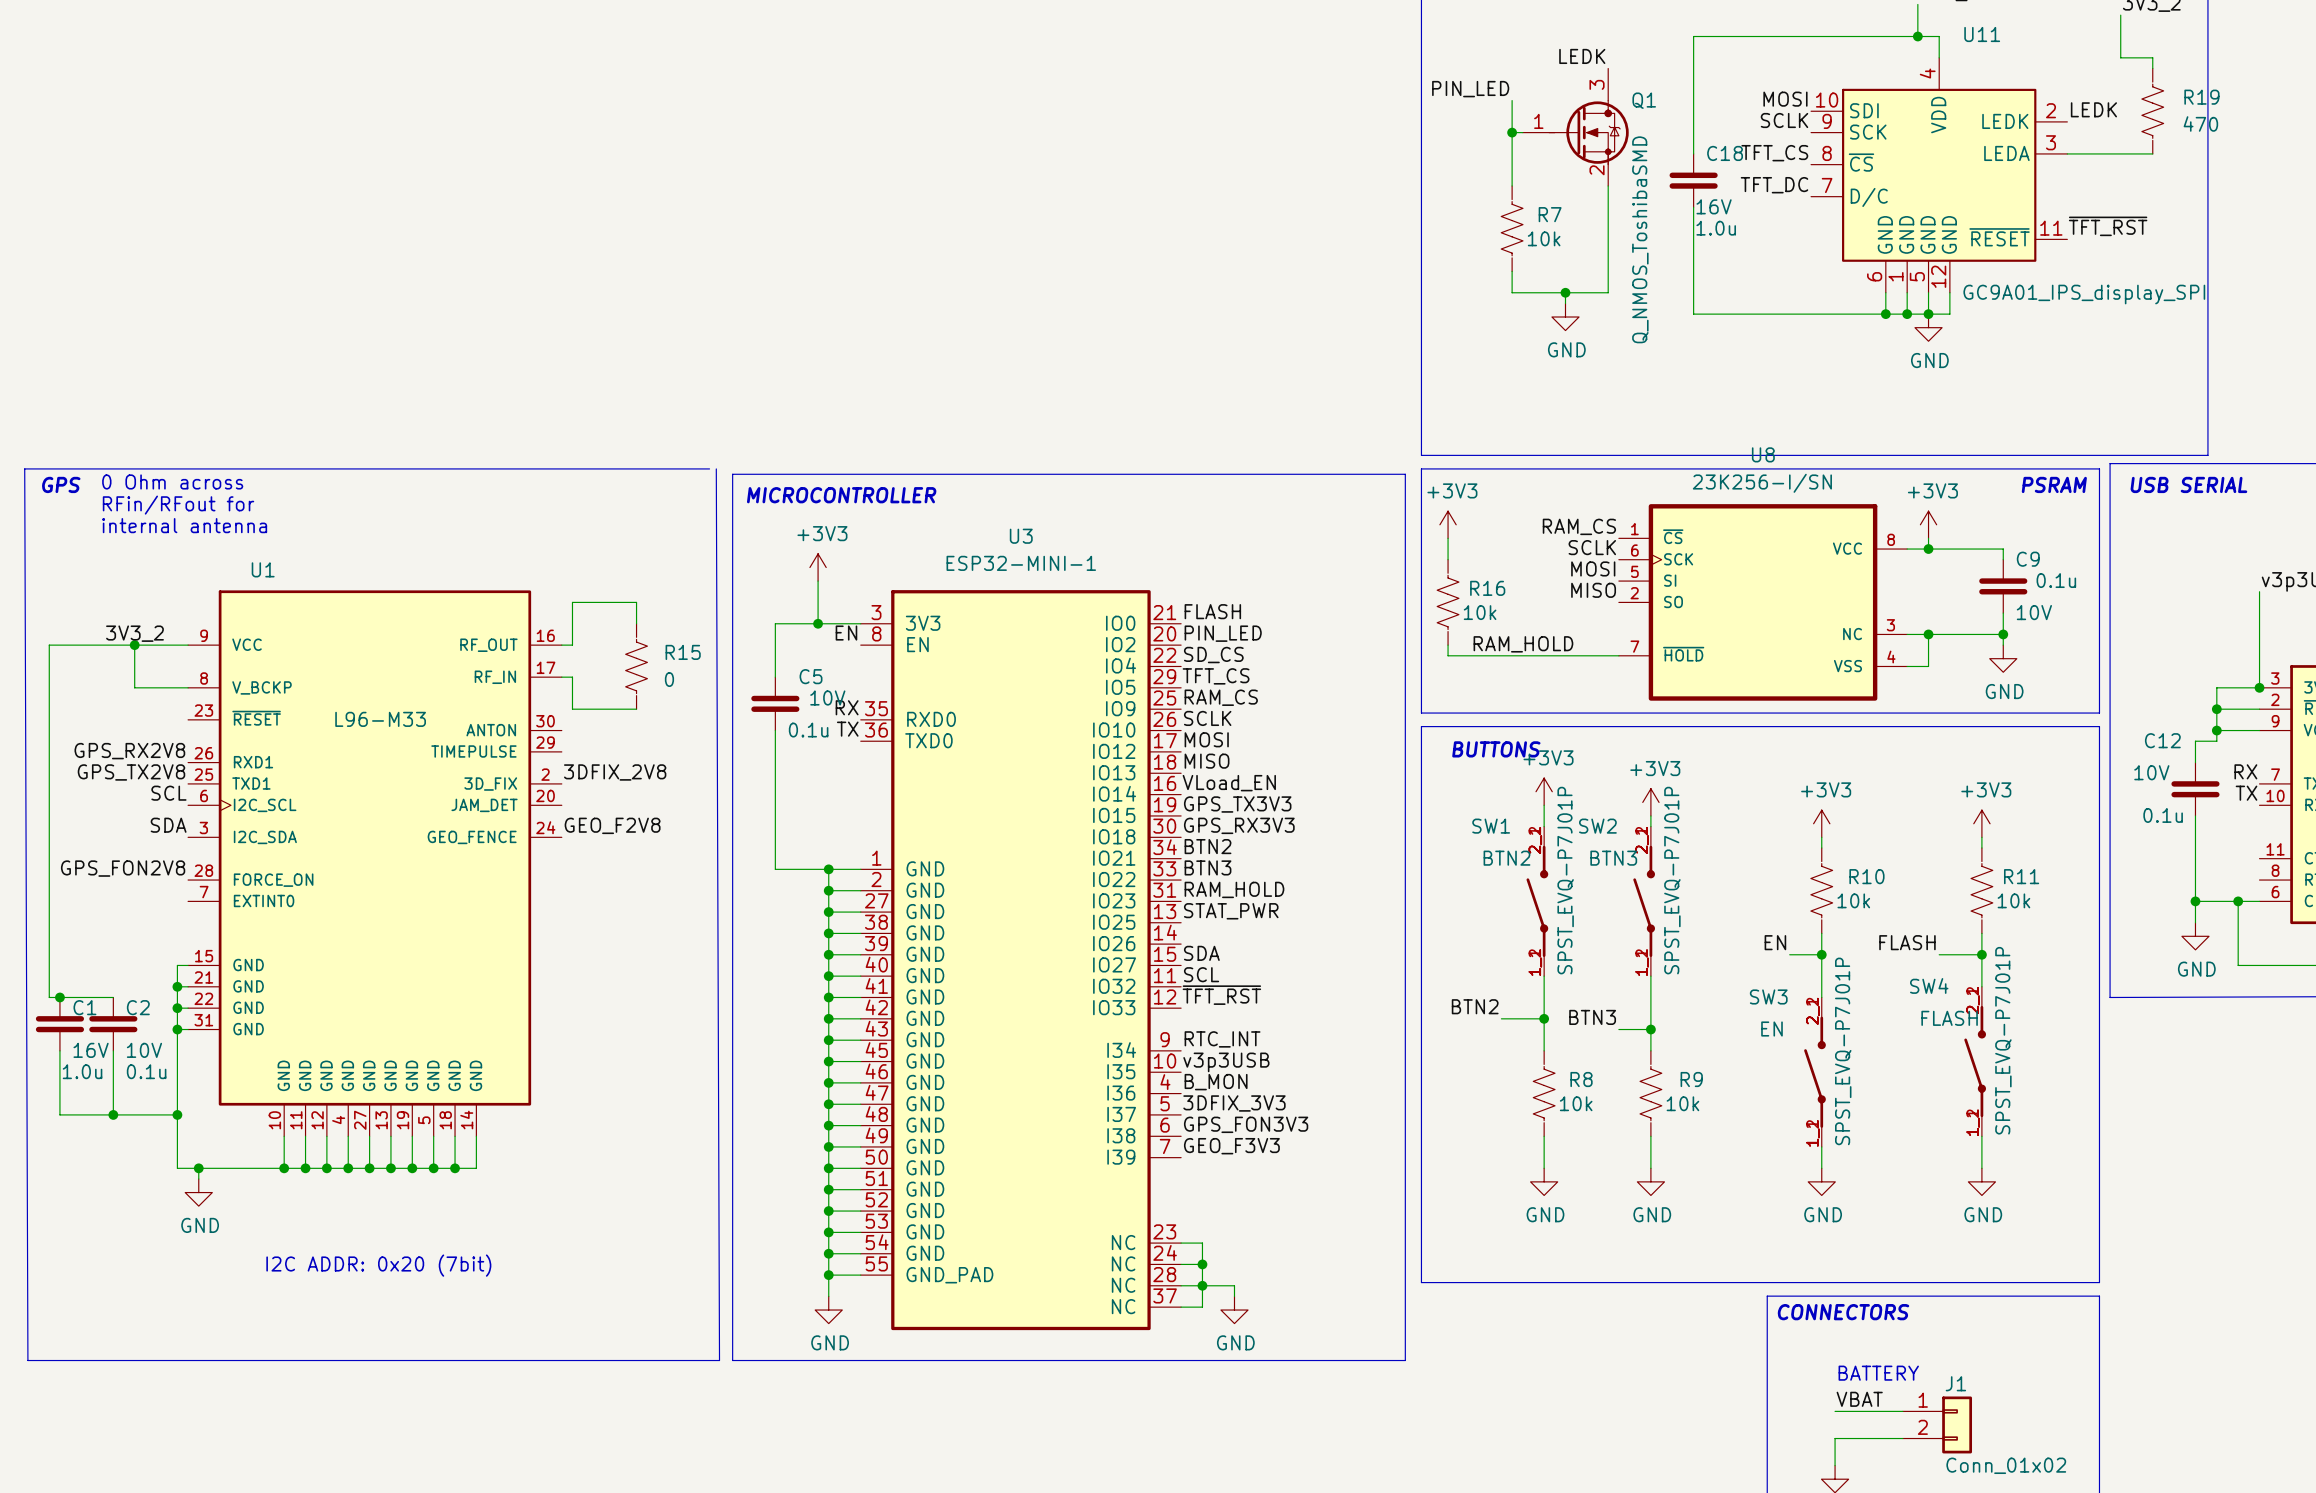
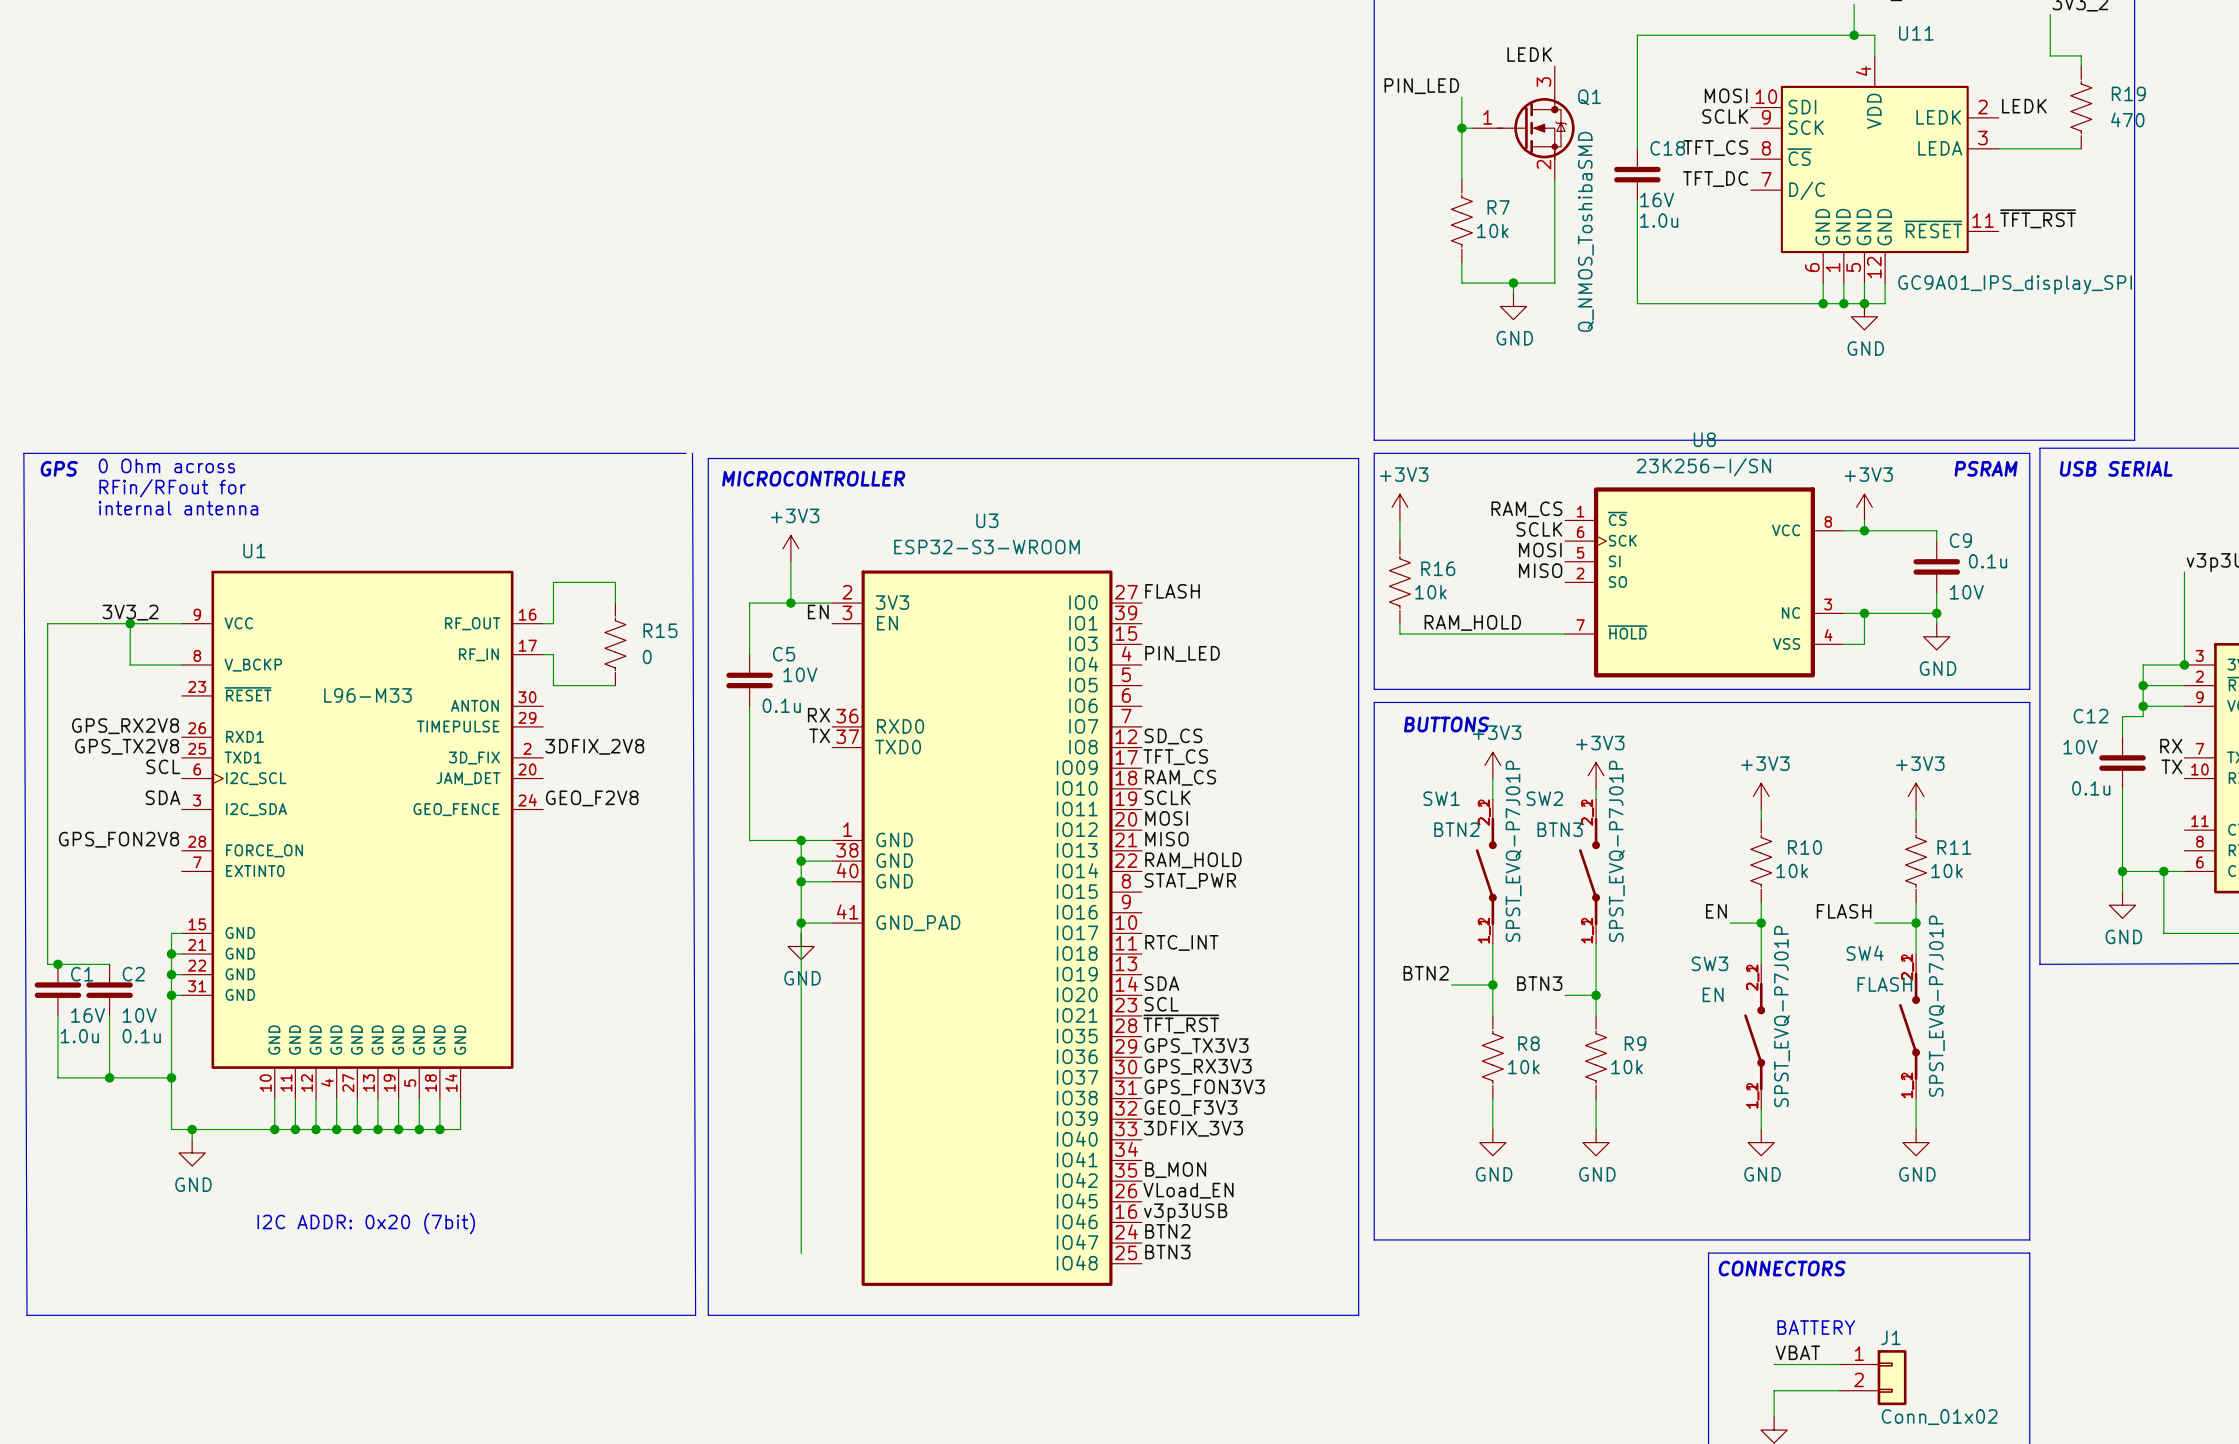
U3 value: ESP32-MINI-1 (1021, 563) -> ESP32-S3-WROOM (987, 547)
U3 symbol: [860, 590, 1182, 1331] -> [832, 570, 1142, 1286]
label: PIN_LED (1223, 633) -> none
label: SD_CS (1213, 655) -> none
label: TFT_CS (1216, 676) -> PIN_LED (1182, 653)
label: RAM_CS (1221, 697) -> none
label position: RX (847, 707) -> RX (818, 715)
label: SCLK (1207, 718) -> none
label position: TX (847, 729) -> TX (819, 735)
label: MOSI (1206, 739) -> none
label: MISO (1207, 761) -> SD_CS (1173, 736)
label: VLoad_EN (1229, 783) -> TFT_CS (1175, 757)
label: GPS_TX3V3 (1237, 804) -> RAM_CS (1180, 777)
label: GPS_RX3V3 (1239, 825) -> SCLK (1167, 797)
label: BTN2 (1208, 846) -> MOSI (1166, 818)
label: BTN3 (1208, 867) -> MISO (1166, 839)
wire: (828, 933) (860, 933) -> none
junction: (828, 933) -> none
label position: SDA (1201, 953) -> SDA (1161, 983)
label: SCL (1201, 974) -> RTC_INT (1181, 942)
wire: (828, 976) (860, 976) -> none
junction: (828, 976) -> none
power symbol: none -> GND (801, 946)
label: ~{TFT_RST} (1221, 995) -> none
wire: (828, 997) (860, 997) -> none
junction: (828, 997) -> none
wire: (828, 1018) (860, 1018) -> none
junction: (828, 1018) -> none
label: RTC_INT (1222, 1039) -> SCL (1161, 1004)
wire: (828, 1040) (860, 1040) -> none
junction: (828, 1040) -> none
wire: (828, 1061) (860, 1061) -> none
junction: (828, 1061) -> none
label: v3p3USB (1226, 1062) -> ~{TFT_RST} (1181, 1024)
wire: (828, 1082) (860, 1082) -> none
junction: (828, 1082) -> none
label: B_MON (1216, 1082) -> GPS_TX3V3 (1196, 1046)
label: 3DFIX_3V3 (1234, 1103) -> GPS_RX3V3 (1198, 1066)
wire: (828, 1104) (860, 1104) -> none
junction: (828, 1104) -> none
wire: (828, 1125) (860, 1125) -> none
junction: (828, 1125) -> none
wire: (828, 1146) (860, 1146) -> none
junction: (828, 1146) -> none
label: none -> 3DFIX_3V3 (1193, 1128)
wire: (828, 1168) (860, 1168) -> none
junction: (828, 1168) -> none
wire: (828, 1189) (860, 1189) -> none
junction: (828, 1189) -> none
label: none -> B_MON (1175, 1170)
wire: (828, 1211) (860, 1211) -> none
junction: (828, 1211) -> none
label: none -> VLoad_EN (1188, 1190)
wire: (828, 1232) (860, 1232) -> none
junction: (828, 1232) -> none
wire: (1181, 1243) (1202, 1243) (1202, 1307) (1181, 1307) -> none
wire: (828, 1253) (860, 1253) -> none
junction: (828, 1253) -> none
label: none -> v3p3USB (1185, 1212)
wire: (1181, 1264) (1202, 1264) -> none
junction: (1202, 1264) -> none
label: none -> BTN2 (1167, 1231)
wire: (828, 1275) (860, 1275) -> none
junction: (828, 1275) -> none
wire: (1181, 1285) (1234, 1285) (1234, 1296) -> none
junction: (1202, 1285) -> none
label: none -> BTN3 (1167, 1252)
power symbol: GND (828, 1310) -> none
power symbol: GND (1234, 1310) -> none

